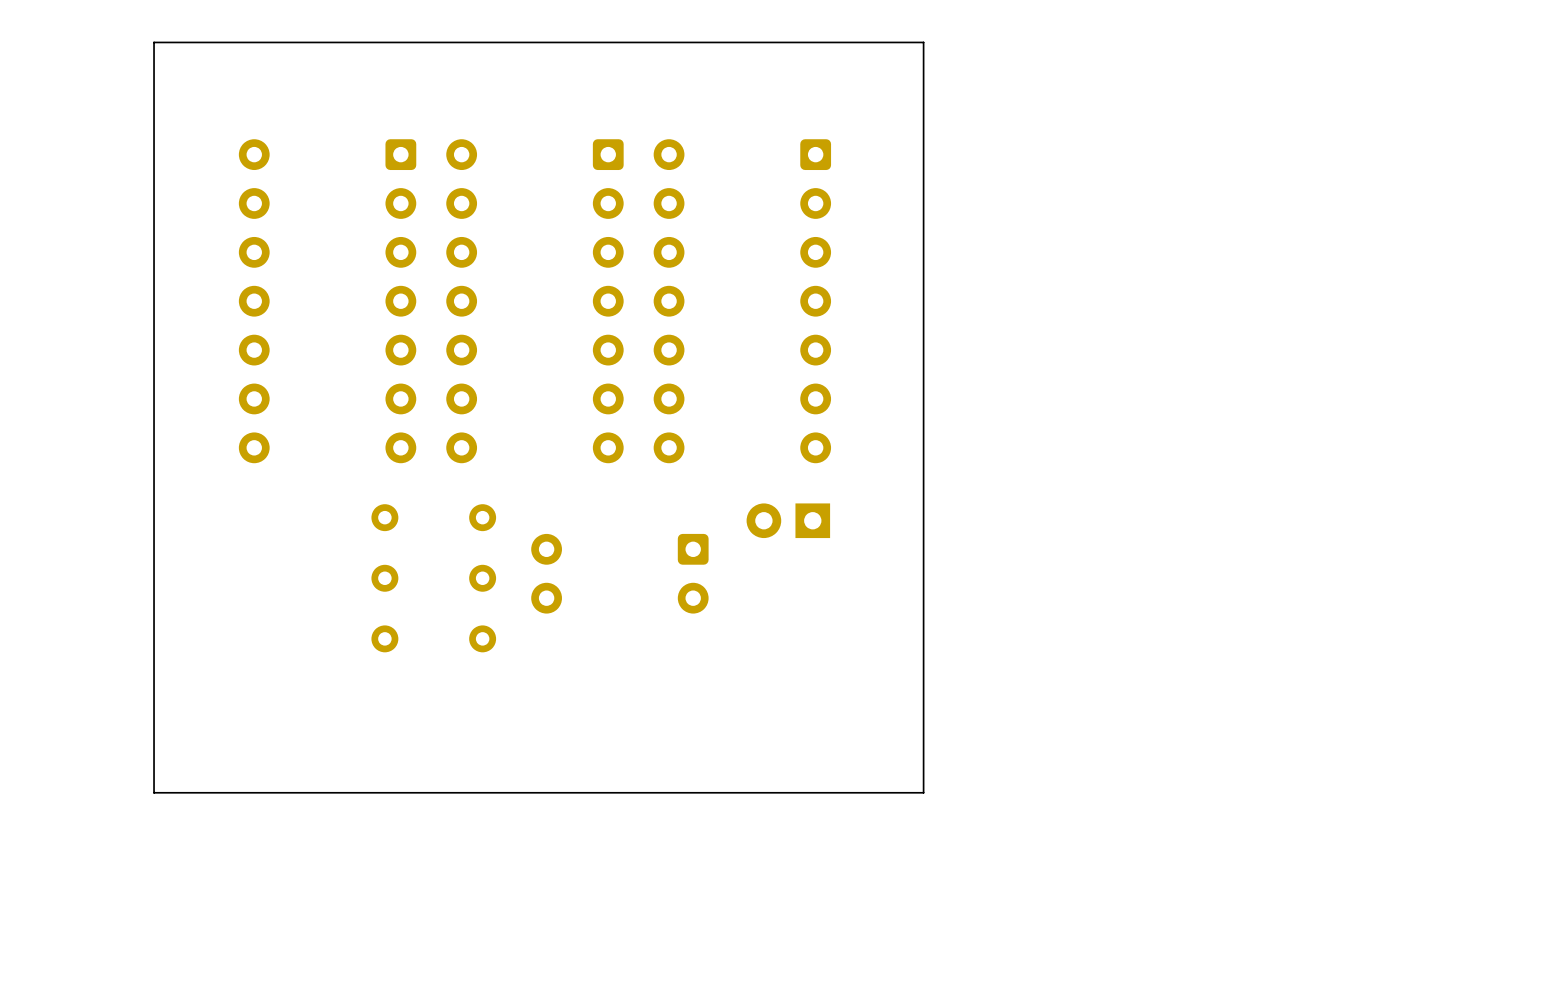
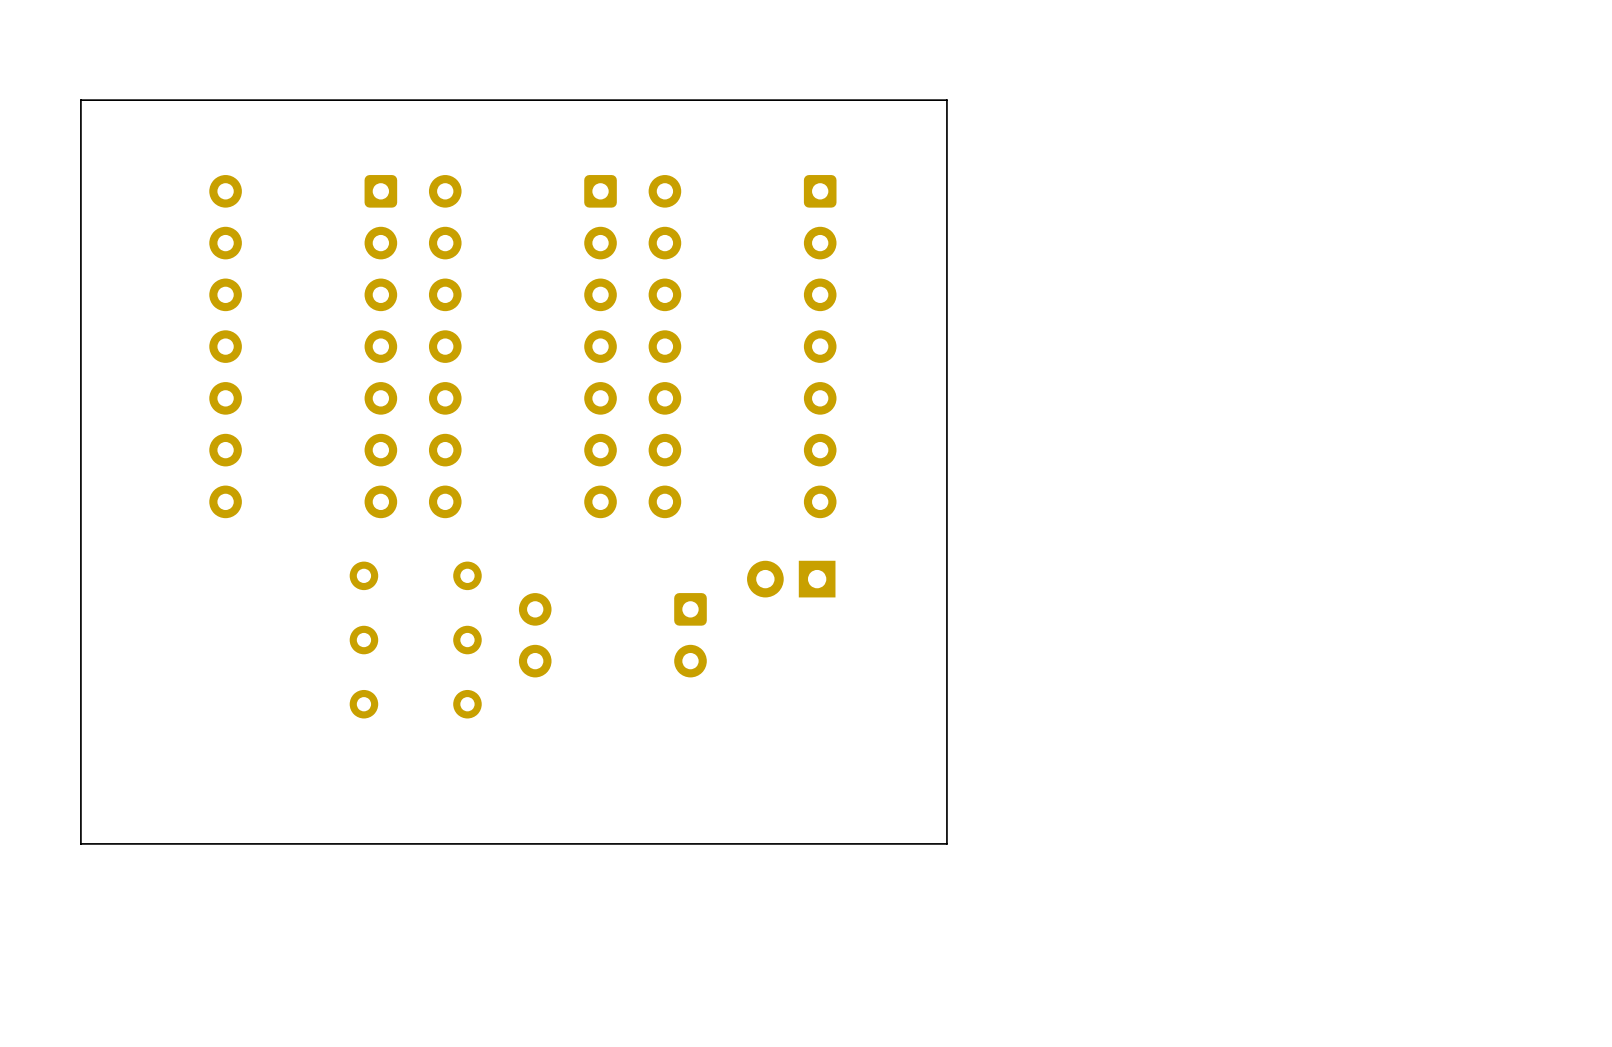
board edge: (923, 42) (154, 42) (154, 792) (923, 792) (923, 42) -> (946, 100) (946, 843) (80, 843) (80, 100) (946, 100)

